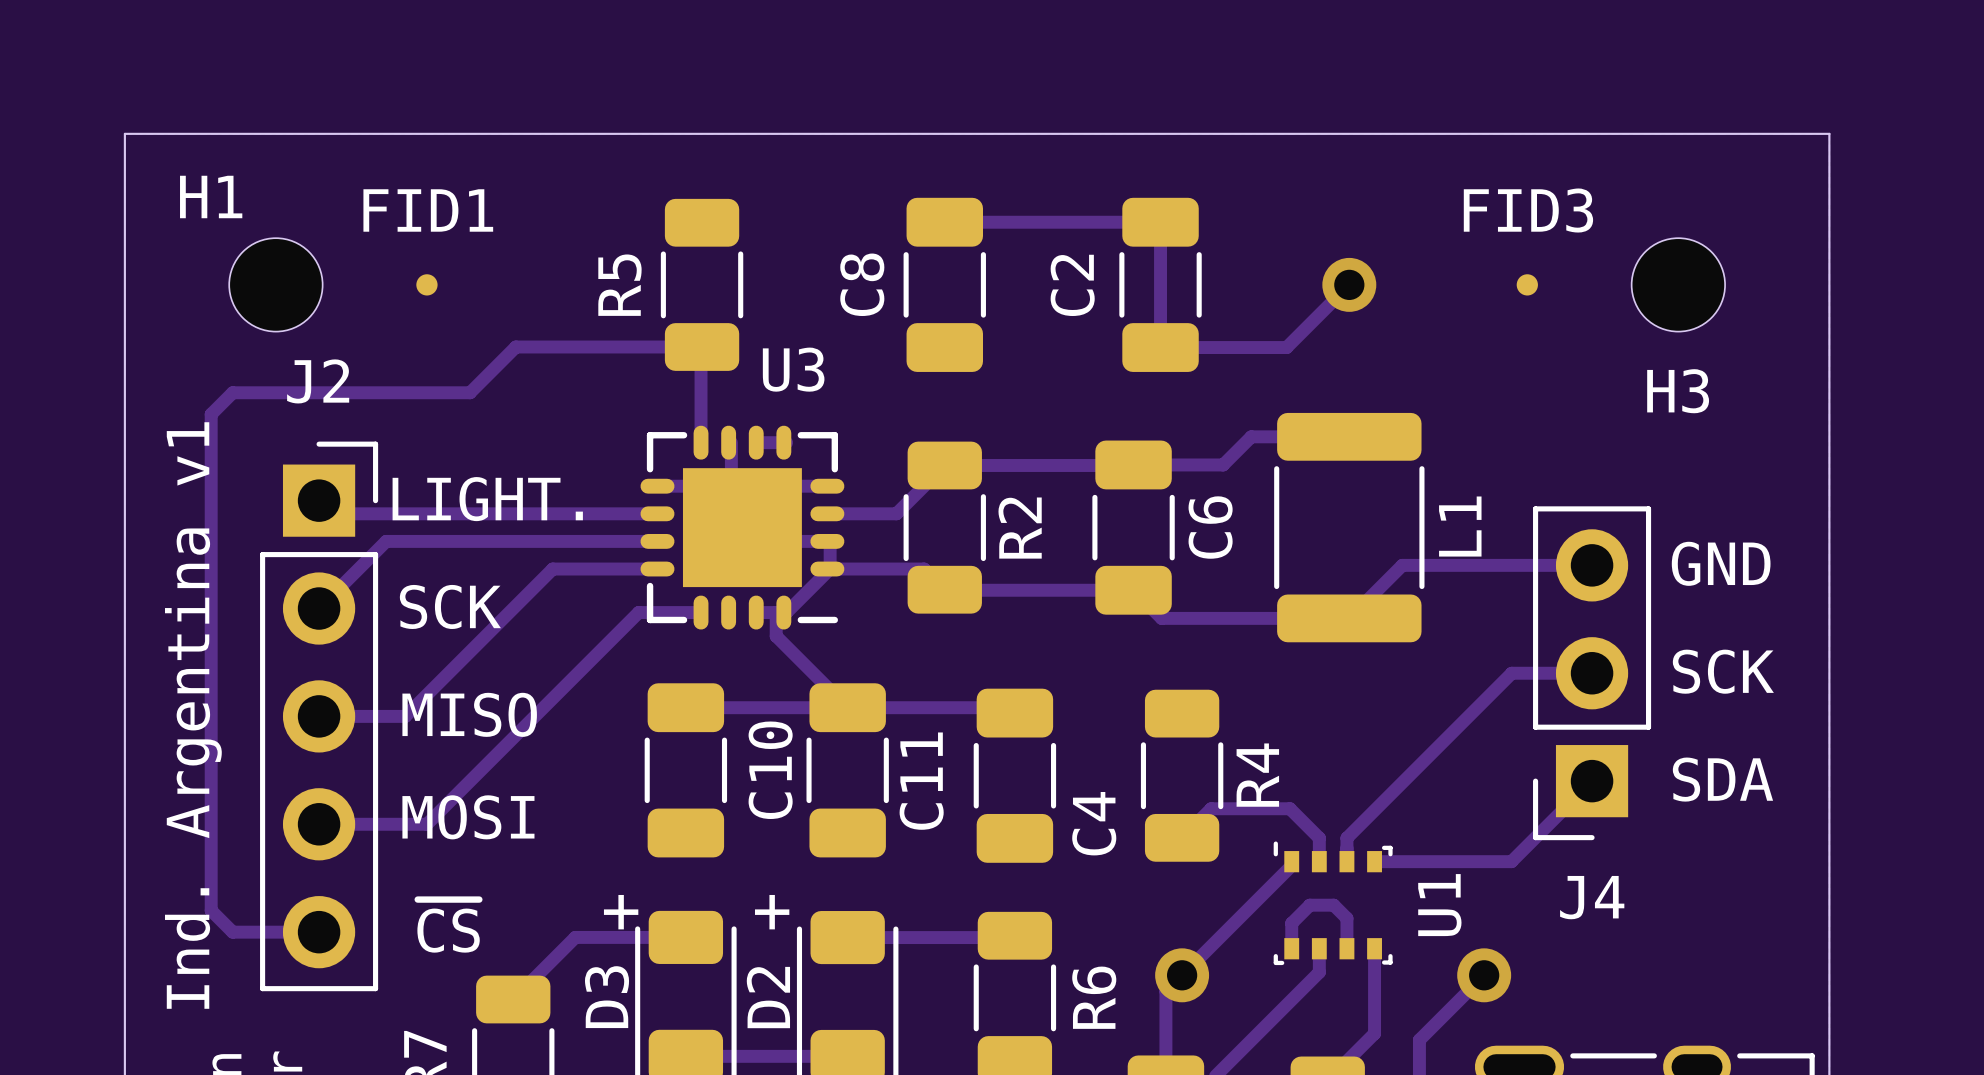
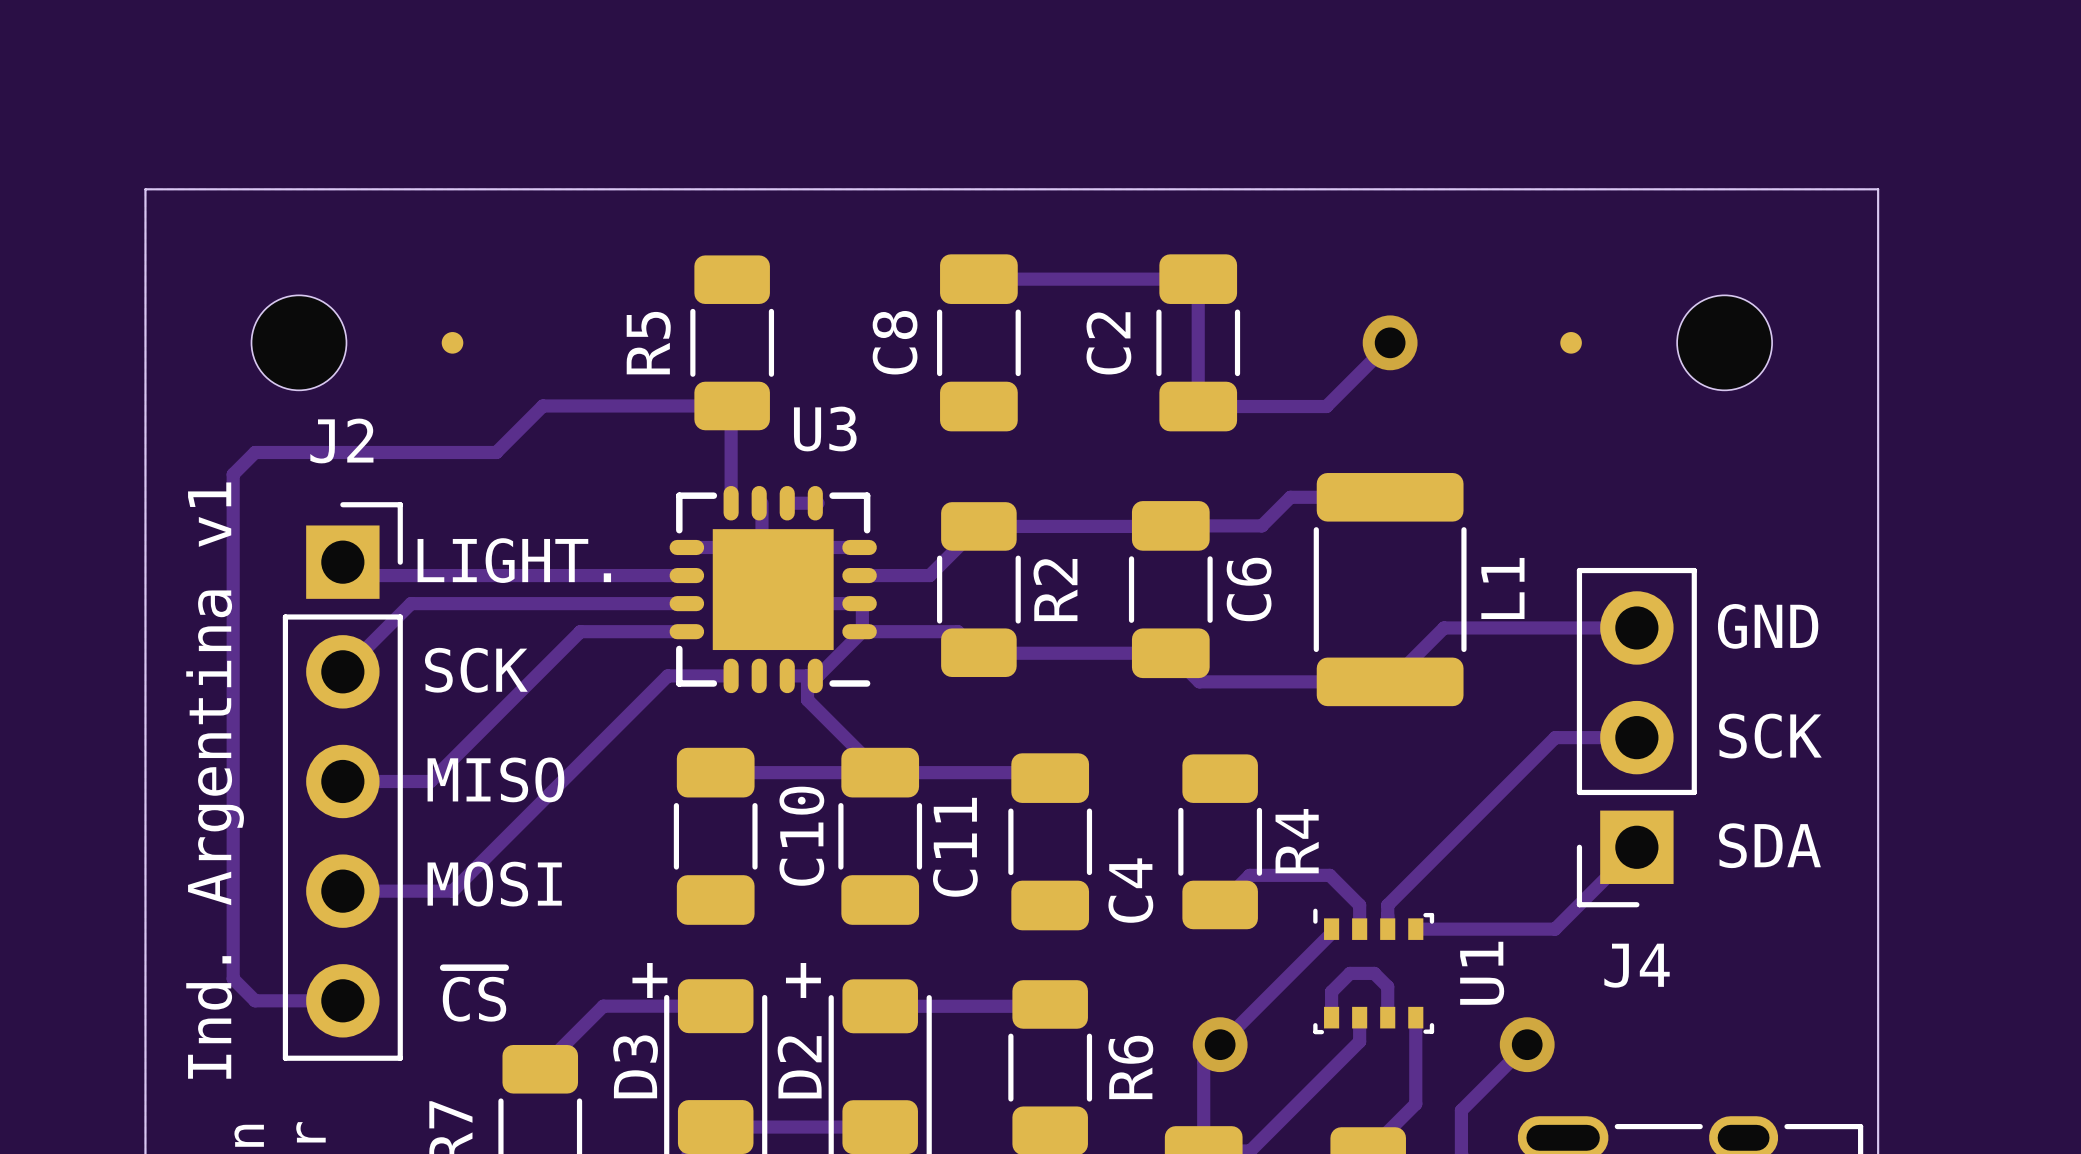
H1 name: H1 (211, 196) -> none
FID1 name: FID1 (428, 210) -> none
FID3 name: FID3 (1528, 210) -> none
H3 name: H3 (1678, 391) -> none

